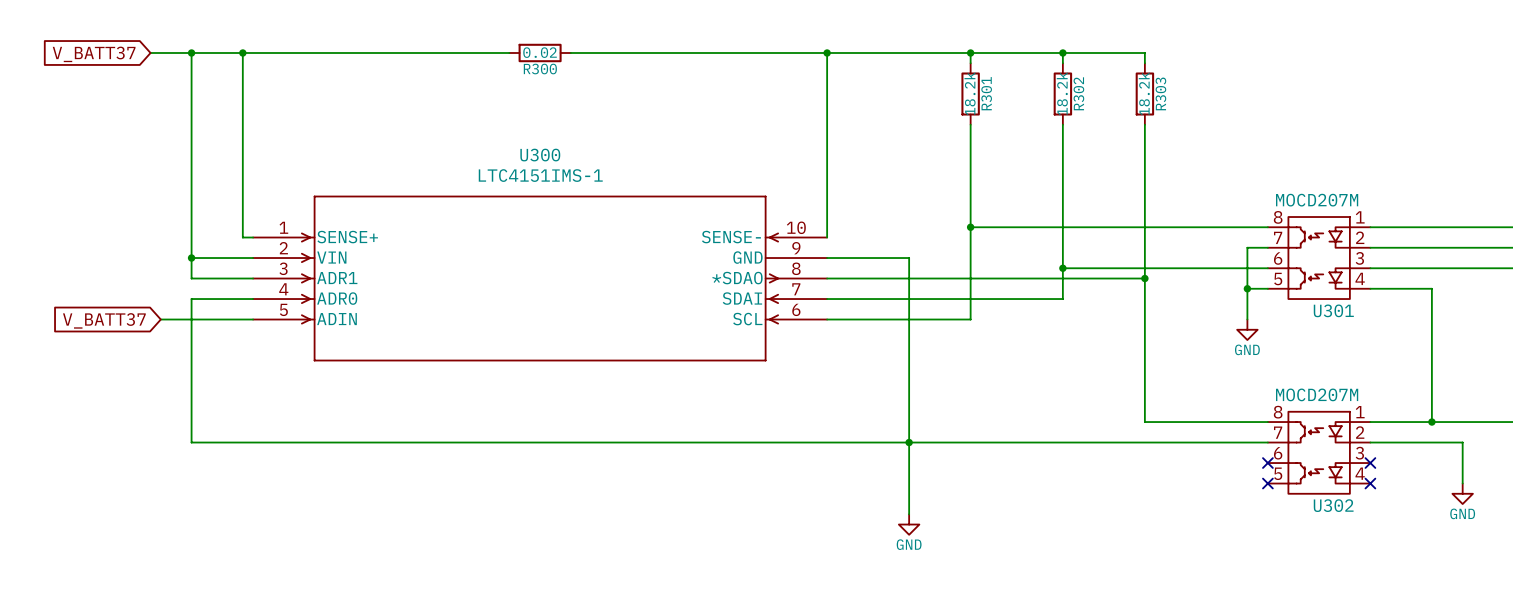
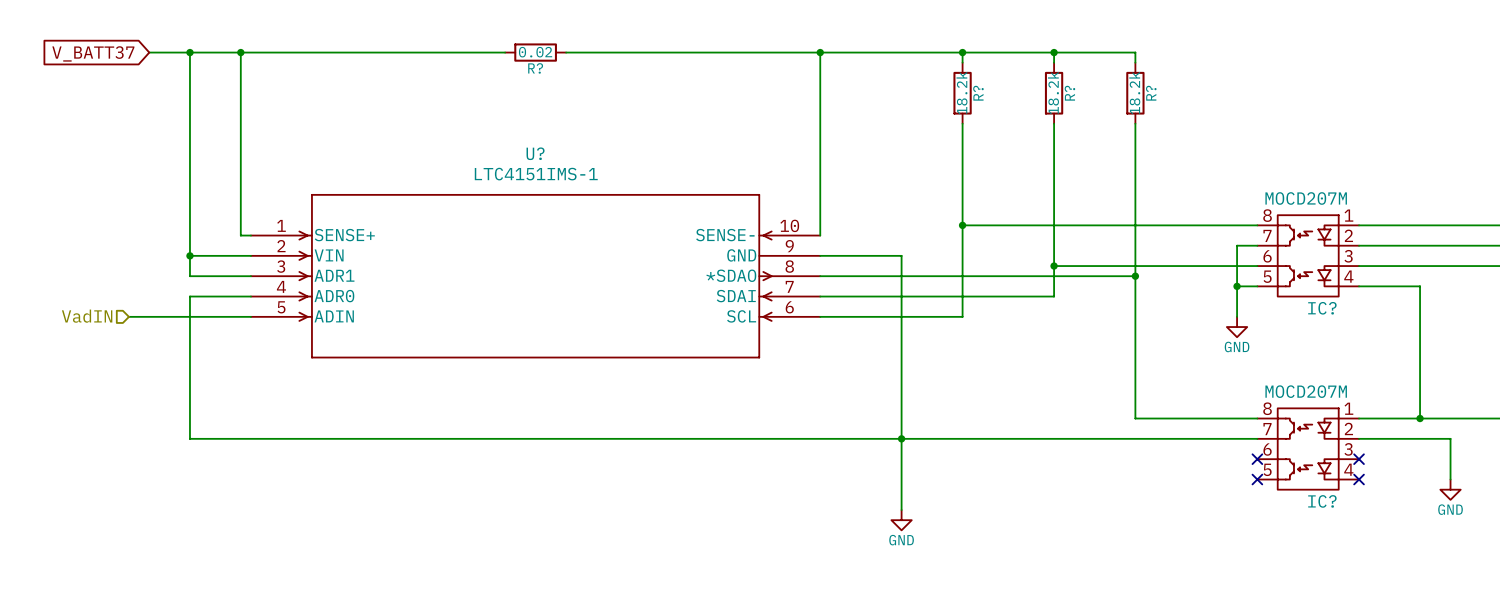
R300 name: R300 (540, 69) -> R? (535, 68)
R301 name: R301 (986, 93) -> R? (978, 93)
R302 name: R302 (1078, 93) -> R? (1069, 93)
R303 name: R303 (1160, 93) -> R? (1151, 93)
U300 name: U300 (540, 155) -> U? (535, 153)
U301 name: U301 (1333, 310) -> IC? (1322, 308)
hierarchical label: none -> VadIN (87, 316)
wire: none -> (128, 316) (159, 316)
global label: V_BATT37 (104, 320) -> none
U302 name: U302 (1333, 505) -> IC? (1322, 501)

